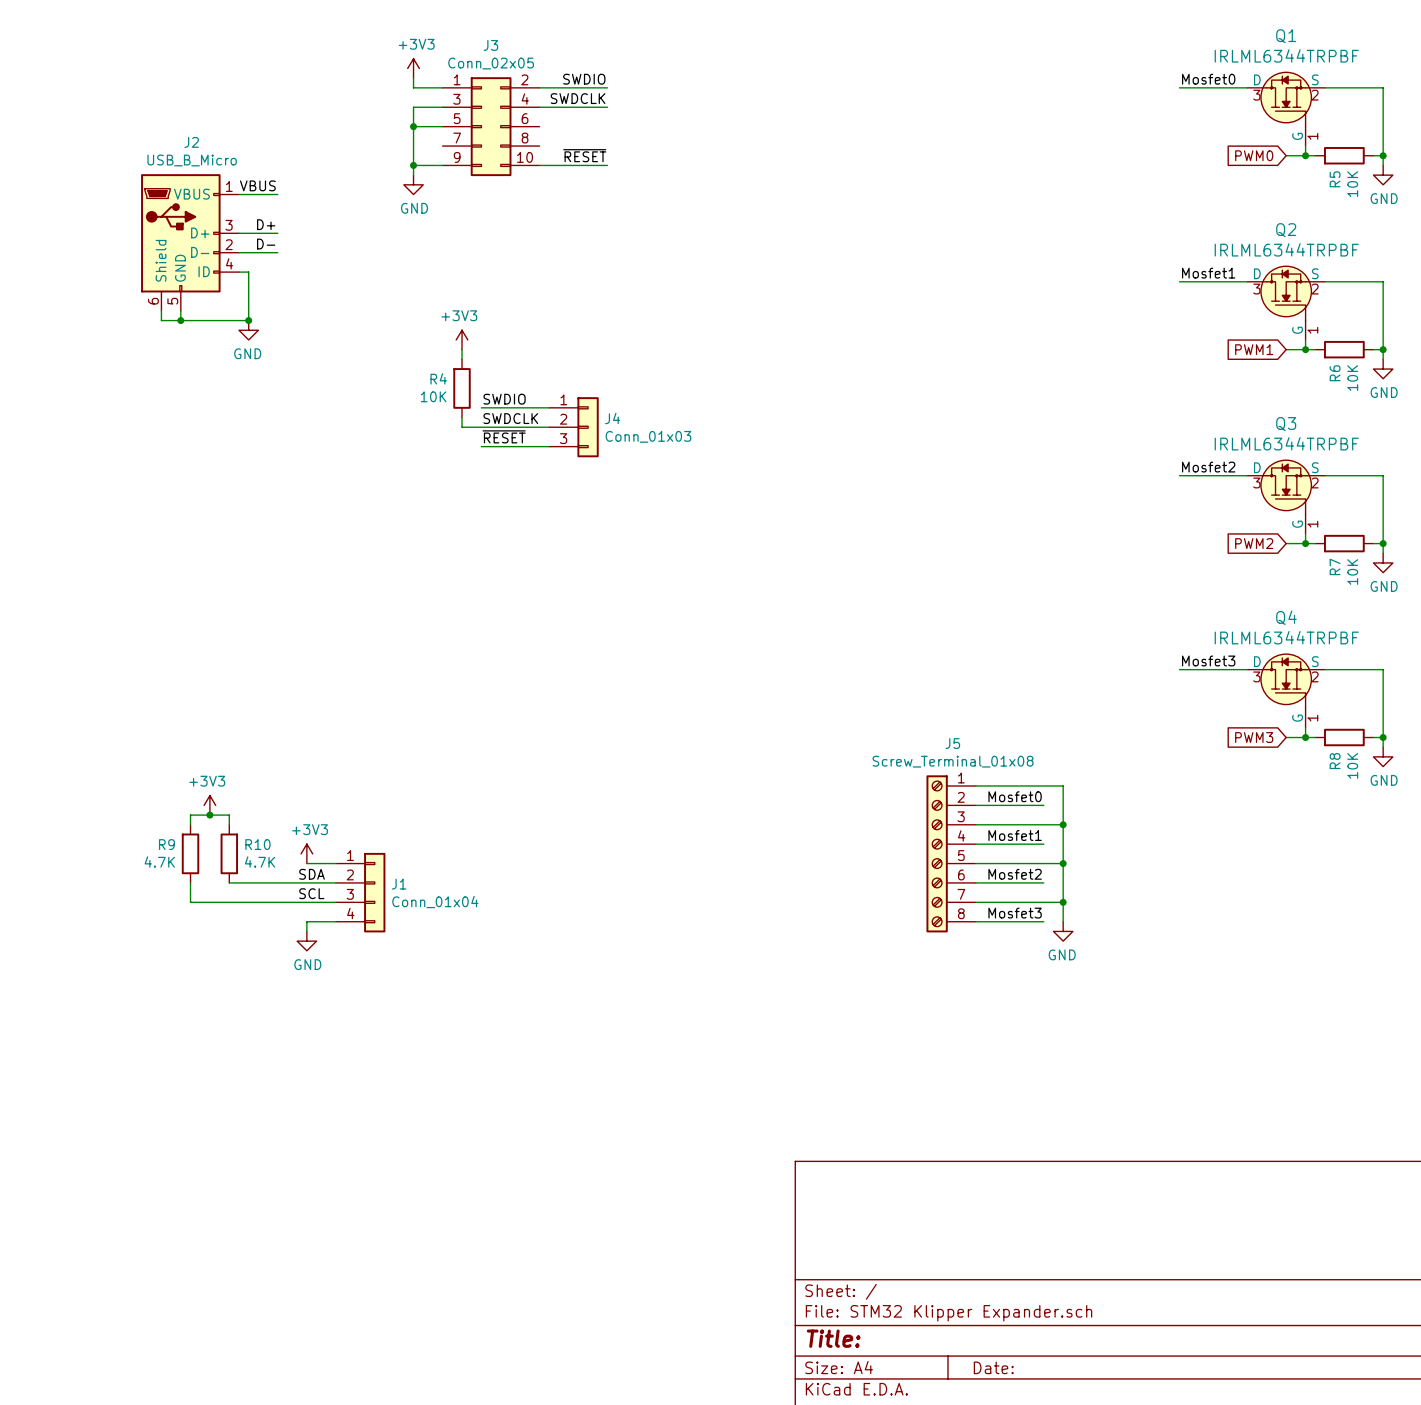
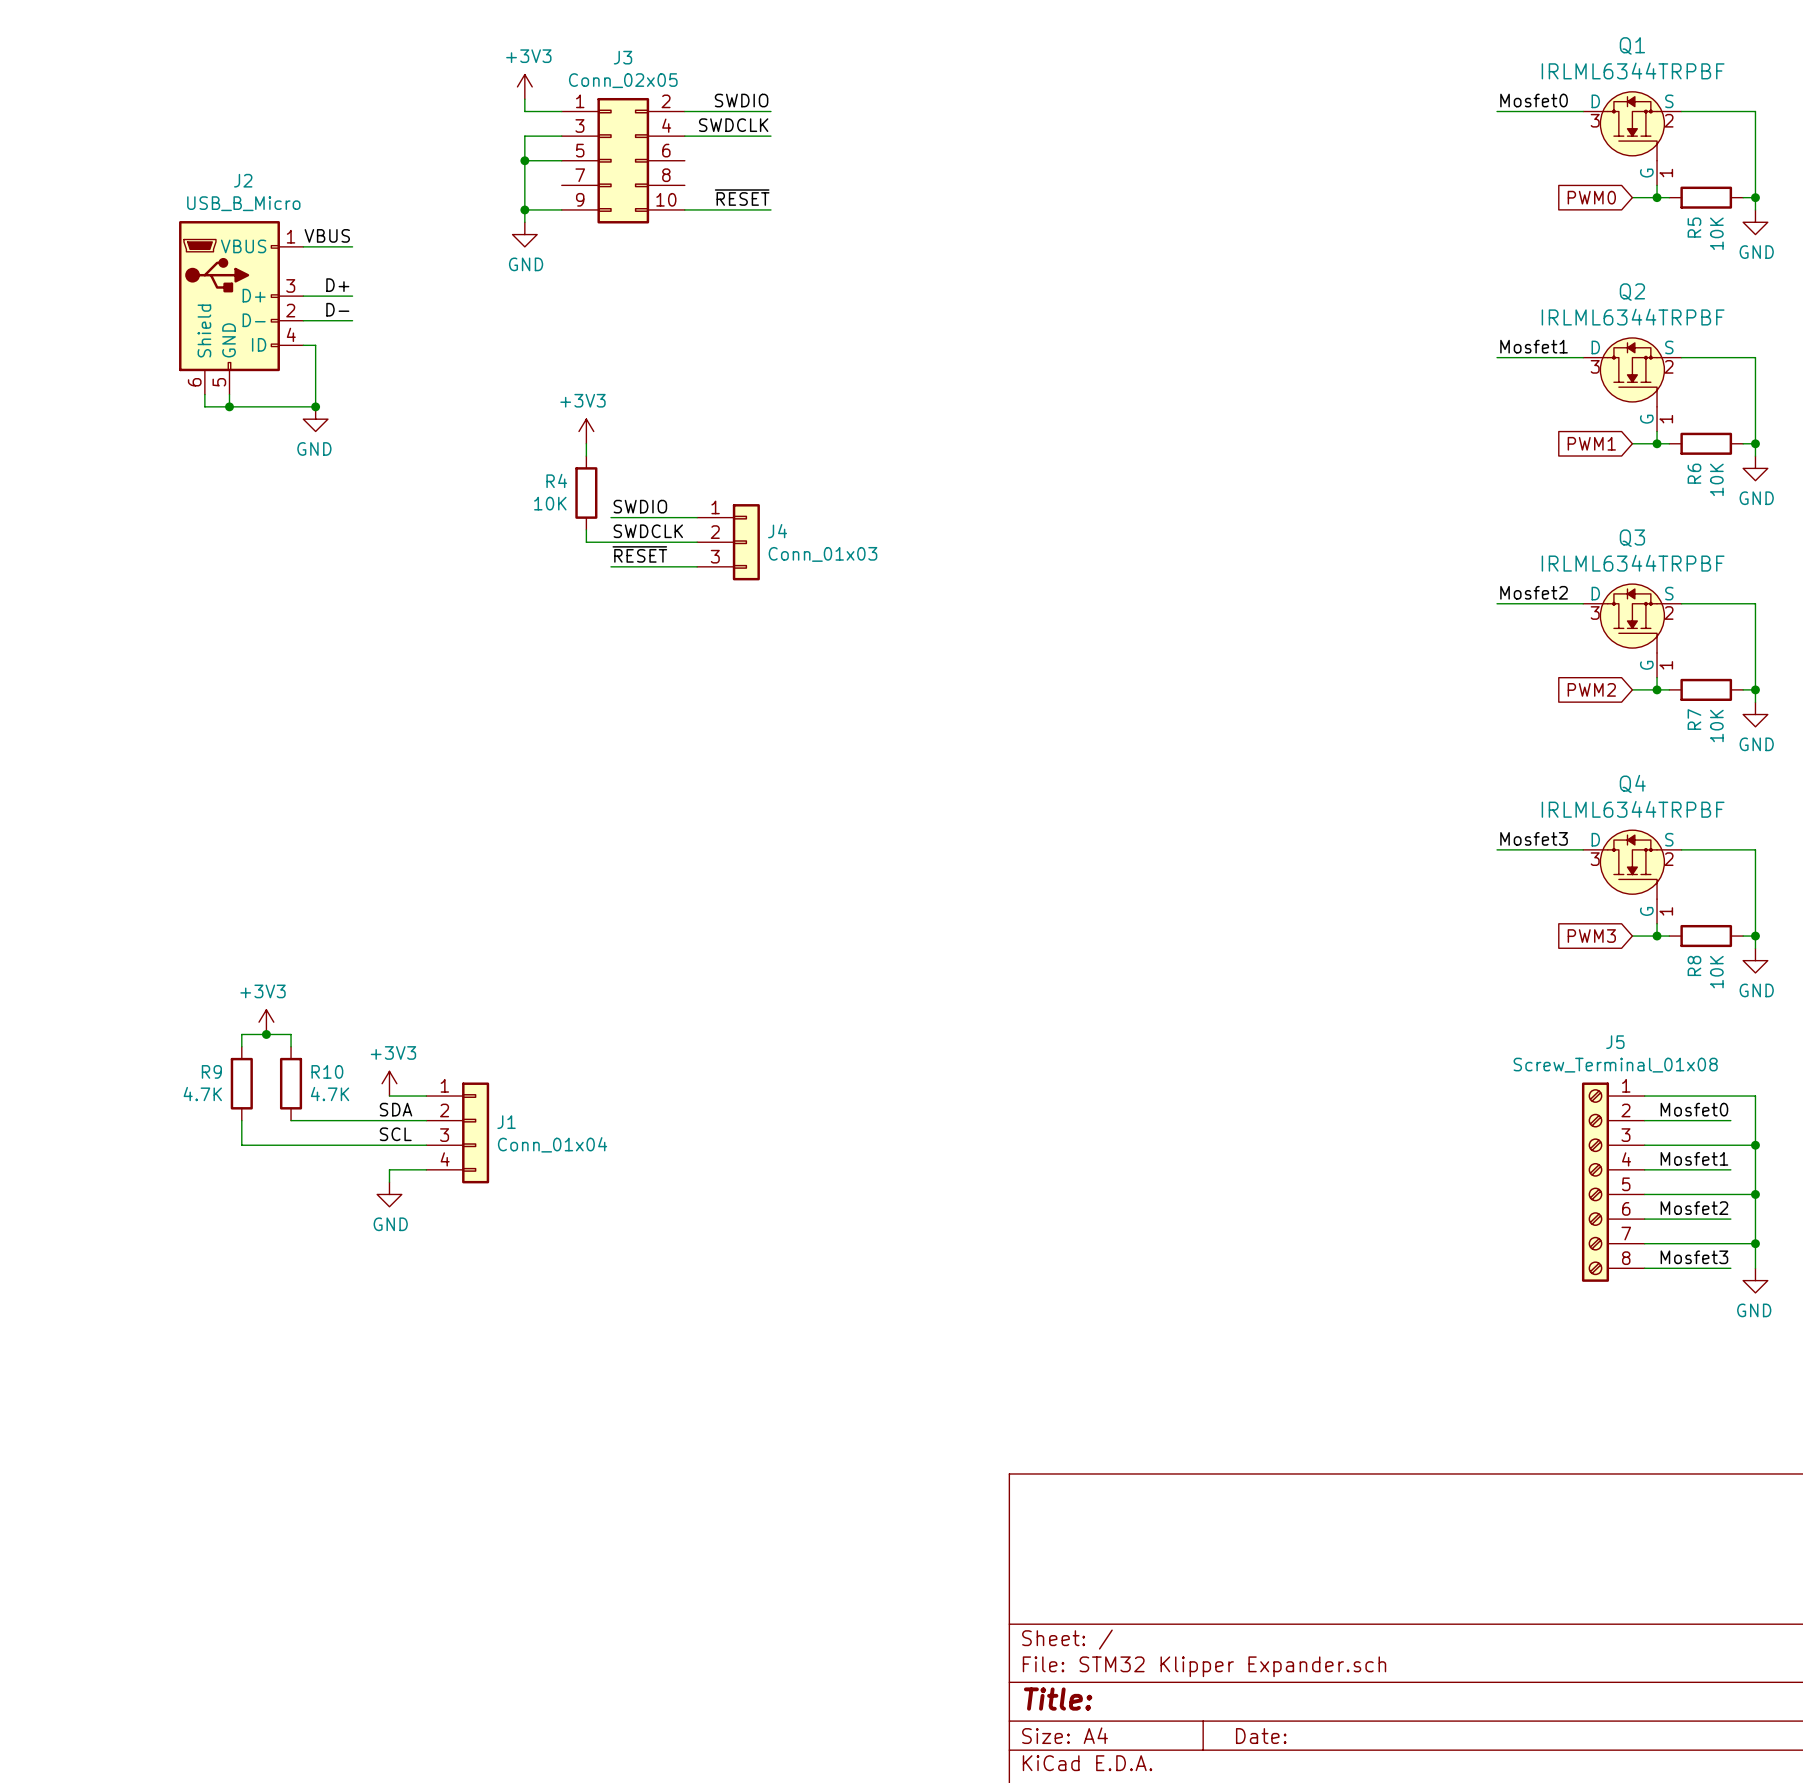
wire: (975, 785) (1063, 785) (1063, 921) -> none
label: Mosfet0 (1015, 796) -> none
wire: (975, 805) (1043, 805) -> none
wire: (975, 824) (1063, 824) -> none
junction: (1063, 824) -> none
label: Mosfet1 (1015, 835) -> none
wire: (975, 844) (1043, 844) -> none
J5 position: (951, 853) -> (1613, 1182)
wire: (975, 863) (1063, 863) -> none
junction: (1063, 863) -> none
wire: none -> (1644, 1096) (1755, 1096) (1755, 1268)
label: Mosfet2 (1015, 874) -> none
label: none -> Mosfet0 (1694, 1109)
wire: (975, 882) (1043, 882) -> none
wire: none -> (1644, 1120) (1730, 1120)
wire: (975, 902) (1063, 902) -> none
junction: (1063, 902) -> none
wire: none -> (1644, 1145) (1755, 1145)
junction: none -> (1755, 1145)
label: Mosfet3 (1015, 913) -> none
label: none -> Mosfet1 (1694, 1158)
wire: (975, 921) (1043, 921) -> none
wire: none -> (1644, 1169) (1730, 1169)
power symbol: GND (1063, 931) -> none
wire: none -> (1644, 1194) (1755, 1194)
junction: none -> (1755, 1194)
label: none -> Mosfet2 (1694, 1208)
wire: none -> (1644, 1219) (1730, 1219)
wire: none -> (1644, 1243) (1755, 1243)
junction: none -> (1755, 1243)
label: none -> Mosfet3 (1694, 1257)
wire: none -> (1644, 1268) (1730, 1268)
power symbol: none -> GND (1755, 1280)

